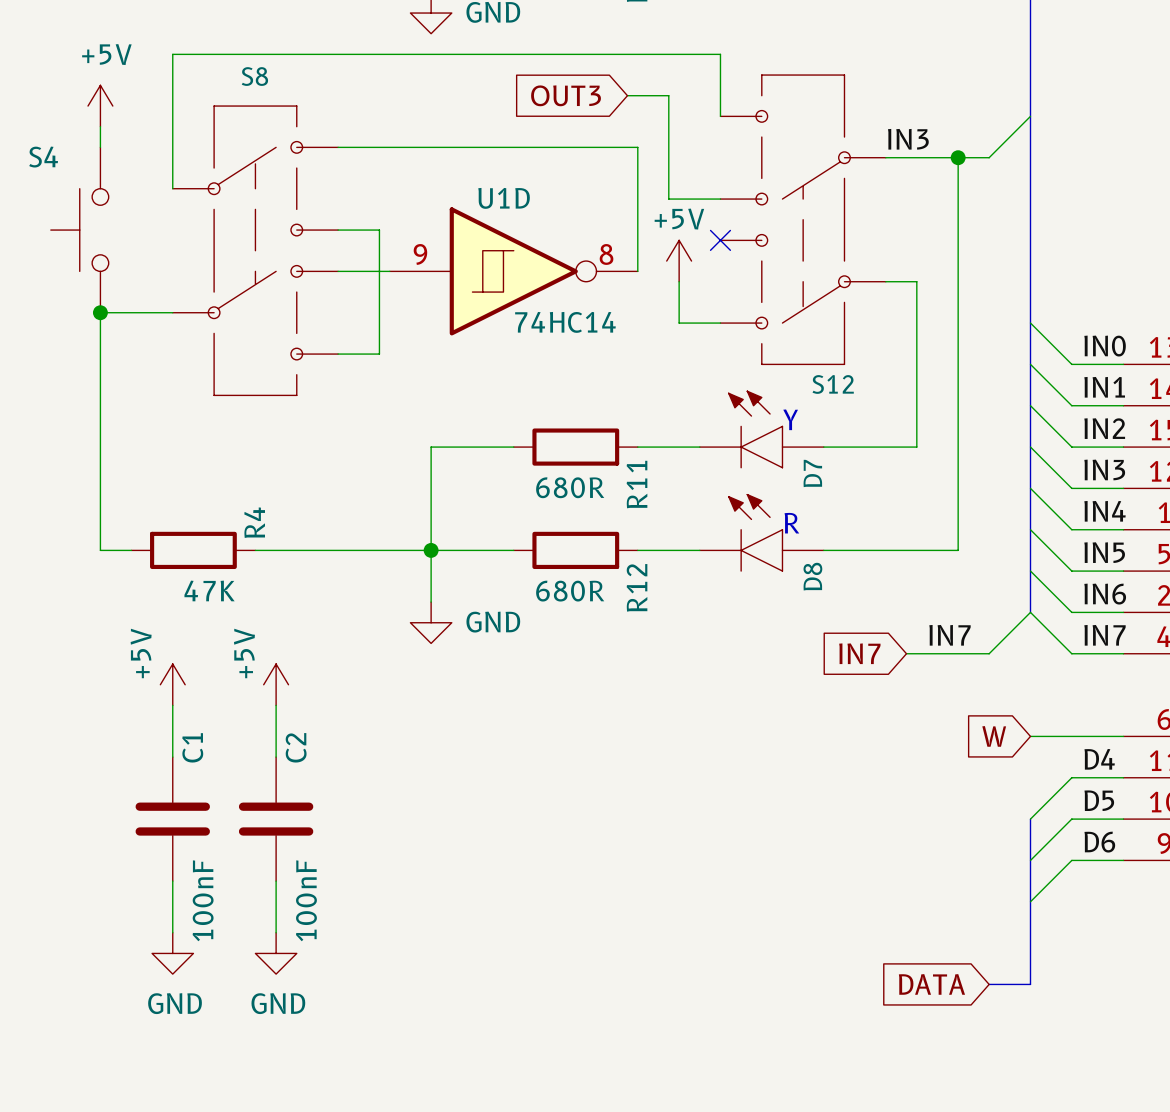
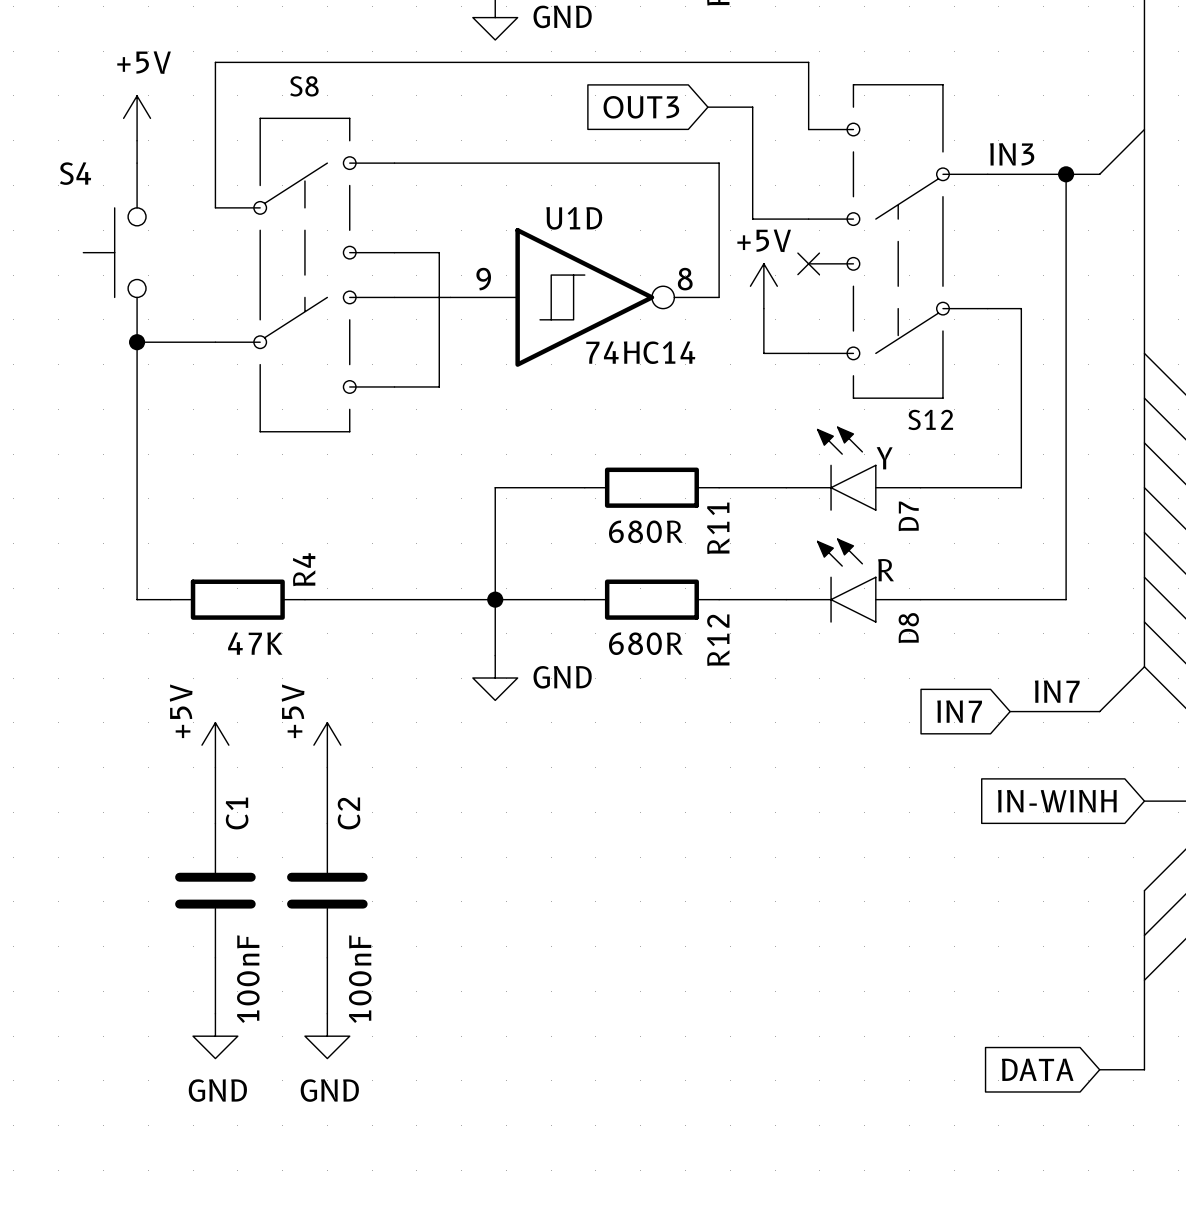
global label: W (994, 736) -> IN-WINH (1057, 801)

